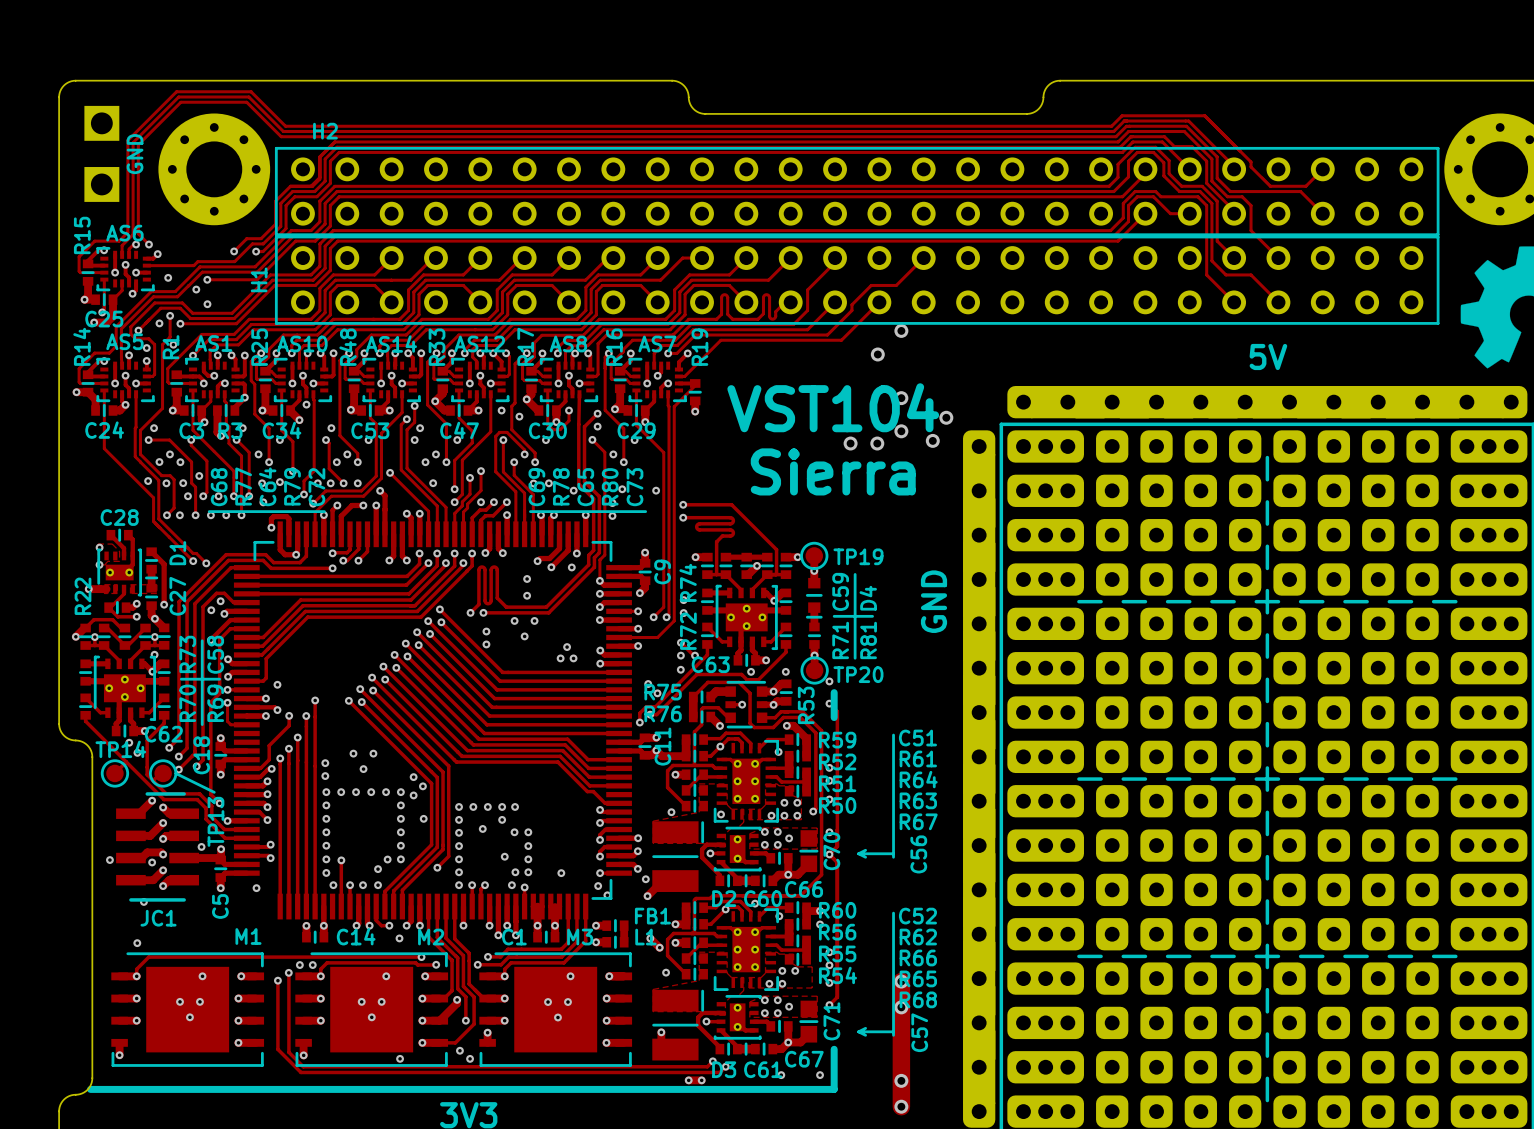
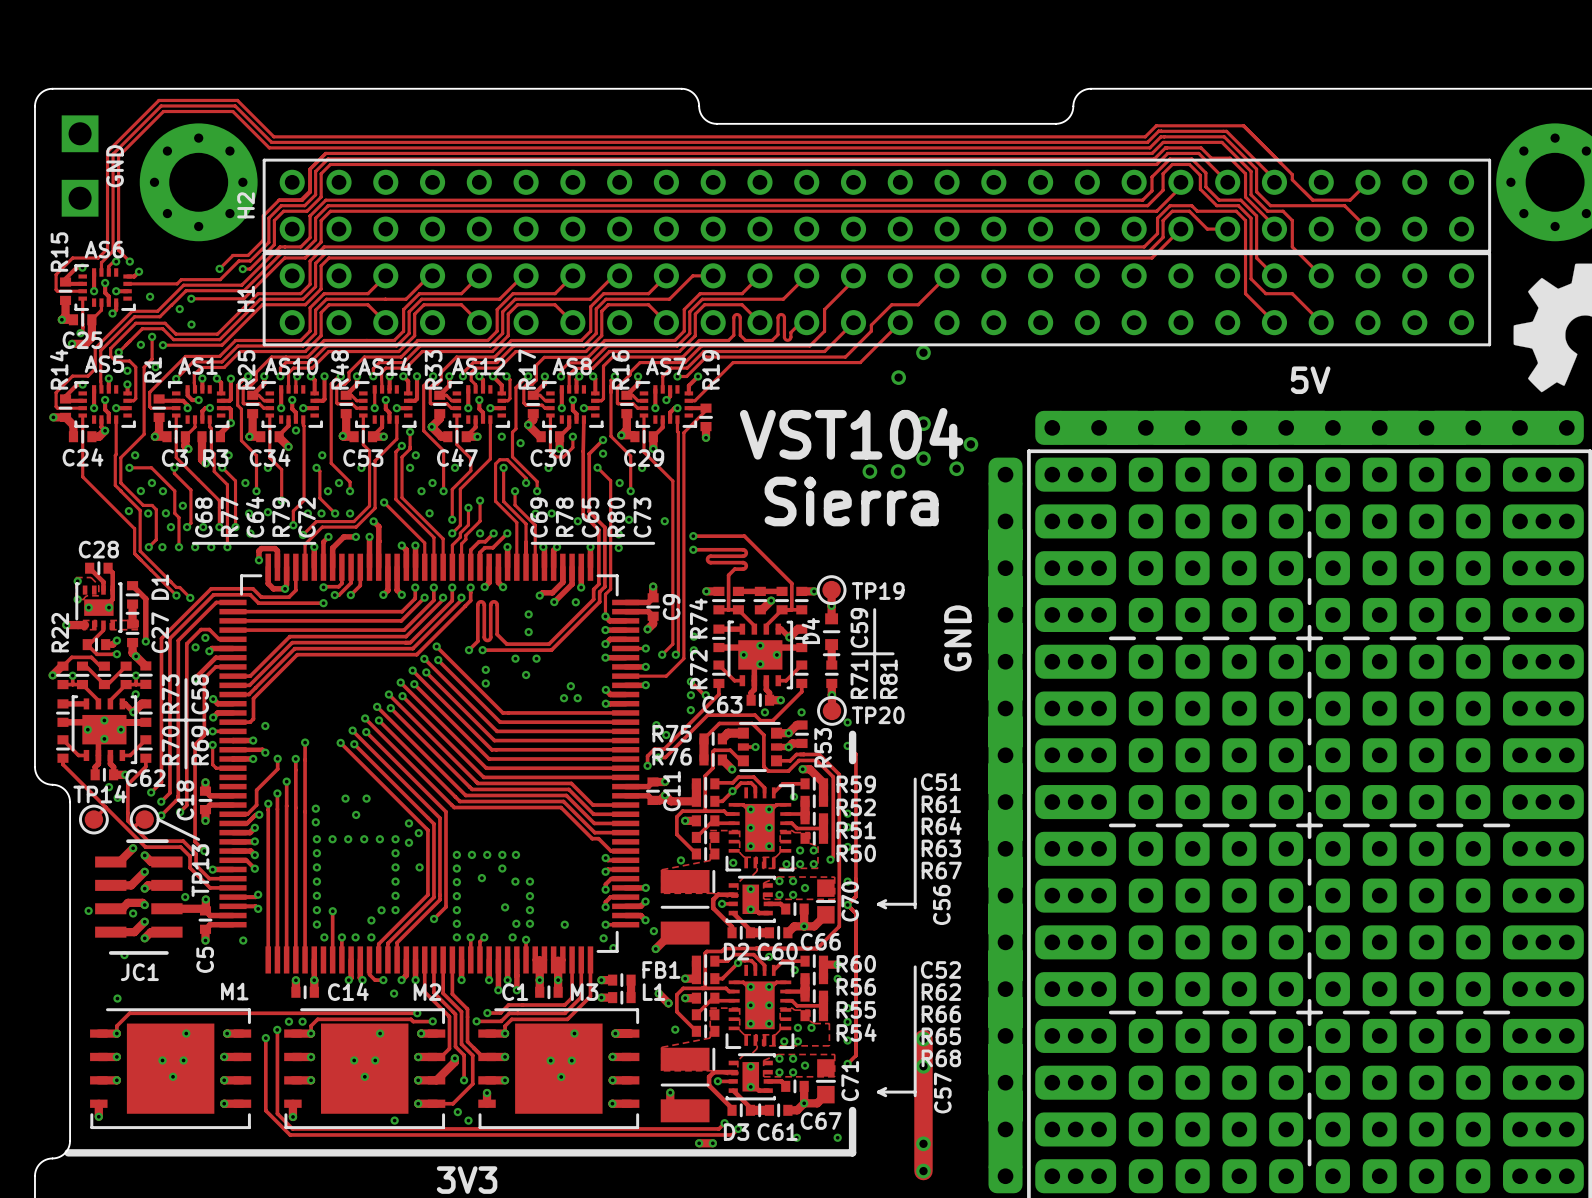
H2 name rotation: 0° (325, 131) -> 90° counterclockwise (246, 205)
H2 name position: H2 (325, 131) -> H2 (246, 205)
D4 name position: D4 (868, 598) -> D4 (810, 631)

